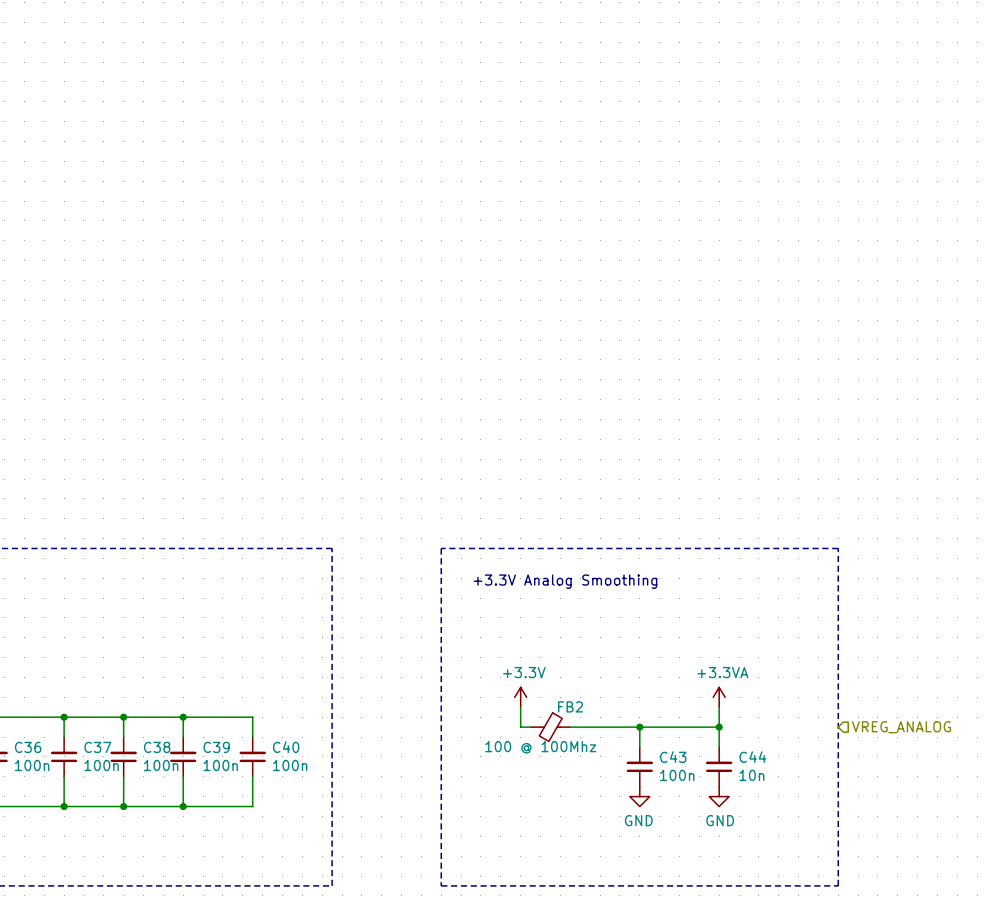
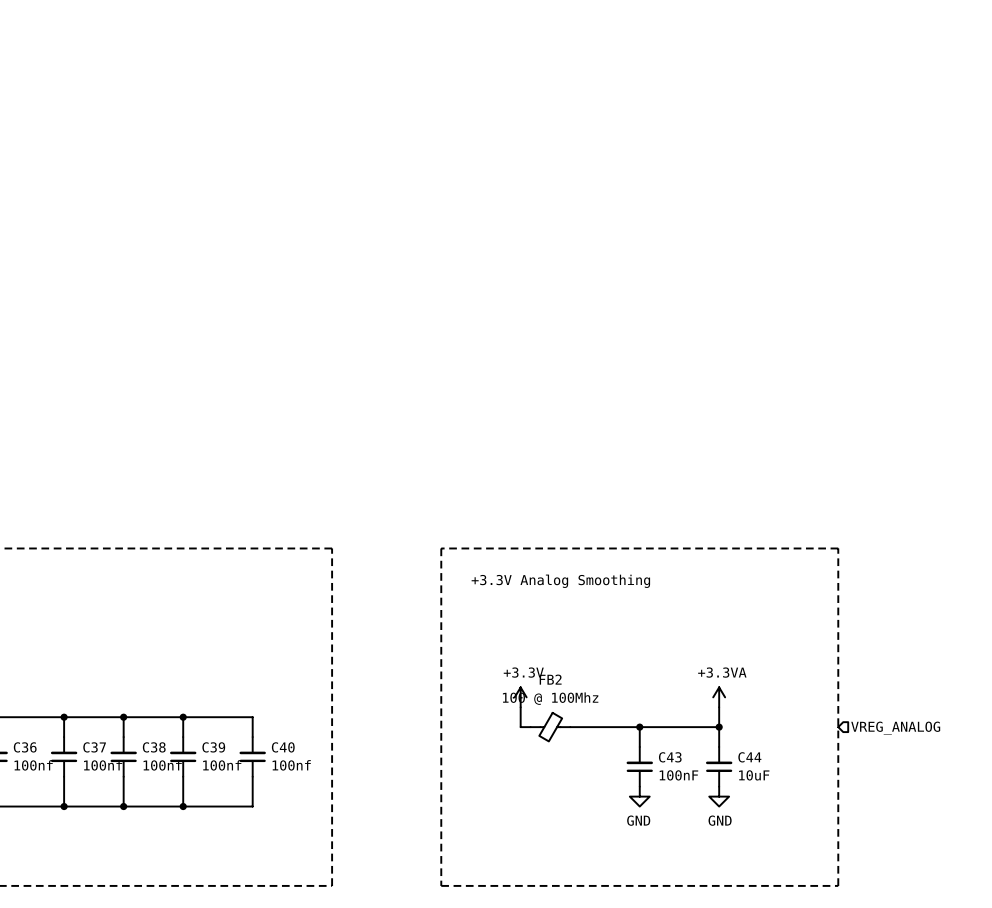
FB2 name position: FB2 (570, 706) -> FB2 (550, 679)
FB2 value position: 100 @ 100Mhz (540, 747) -> 100 @ 100Mhz (550, 698)
C36 value: 100n (32, 765) -> 100nf (33, 765)
C37 value: 100n (101, 765) -> 100nf (103, 765)
C38 value: 100n (161, 765) -> 100nf (162, 765)
C39 value: 100n (220, 765) -> 100nf (222, 765)
C40 value: 100n (290, 765) -> 100nf (291, 765)
C43 value: 100n (677, 775) -> 100nF (678, 775)
C44 value: 10n (751, 775) -> 10uF (754, 775)

